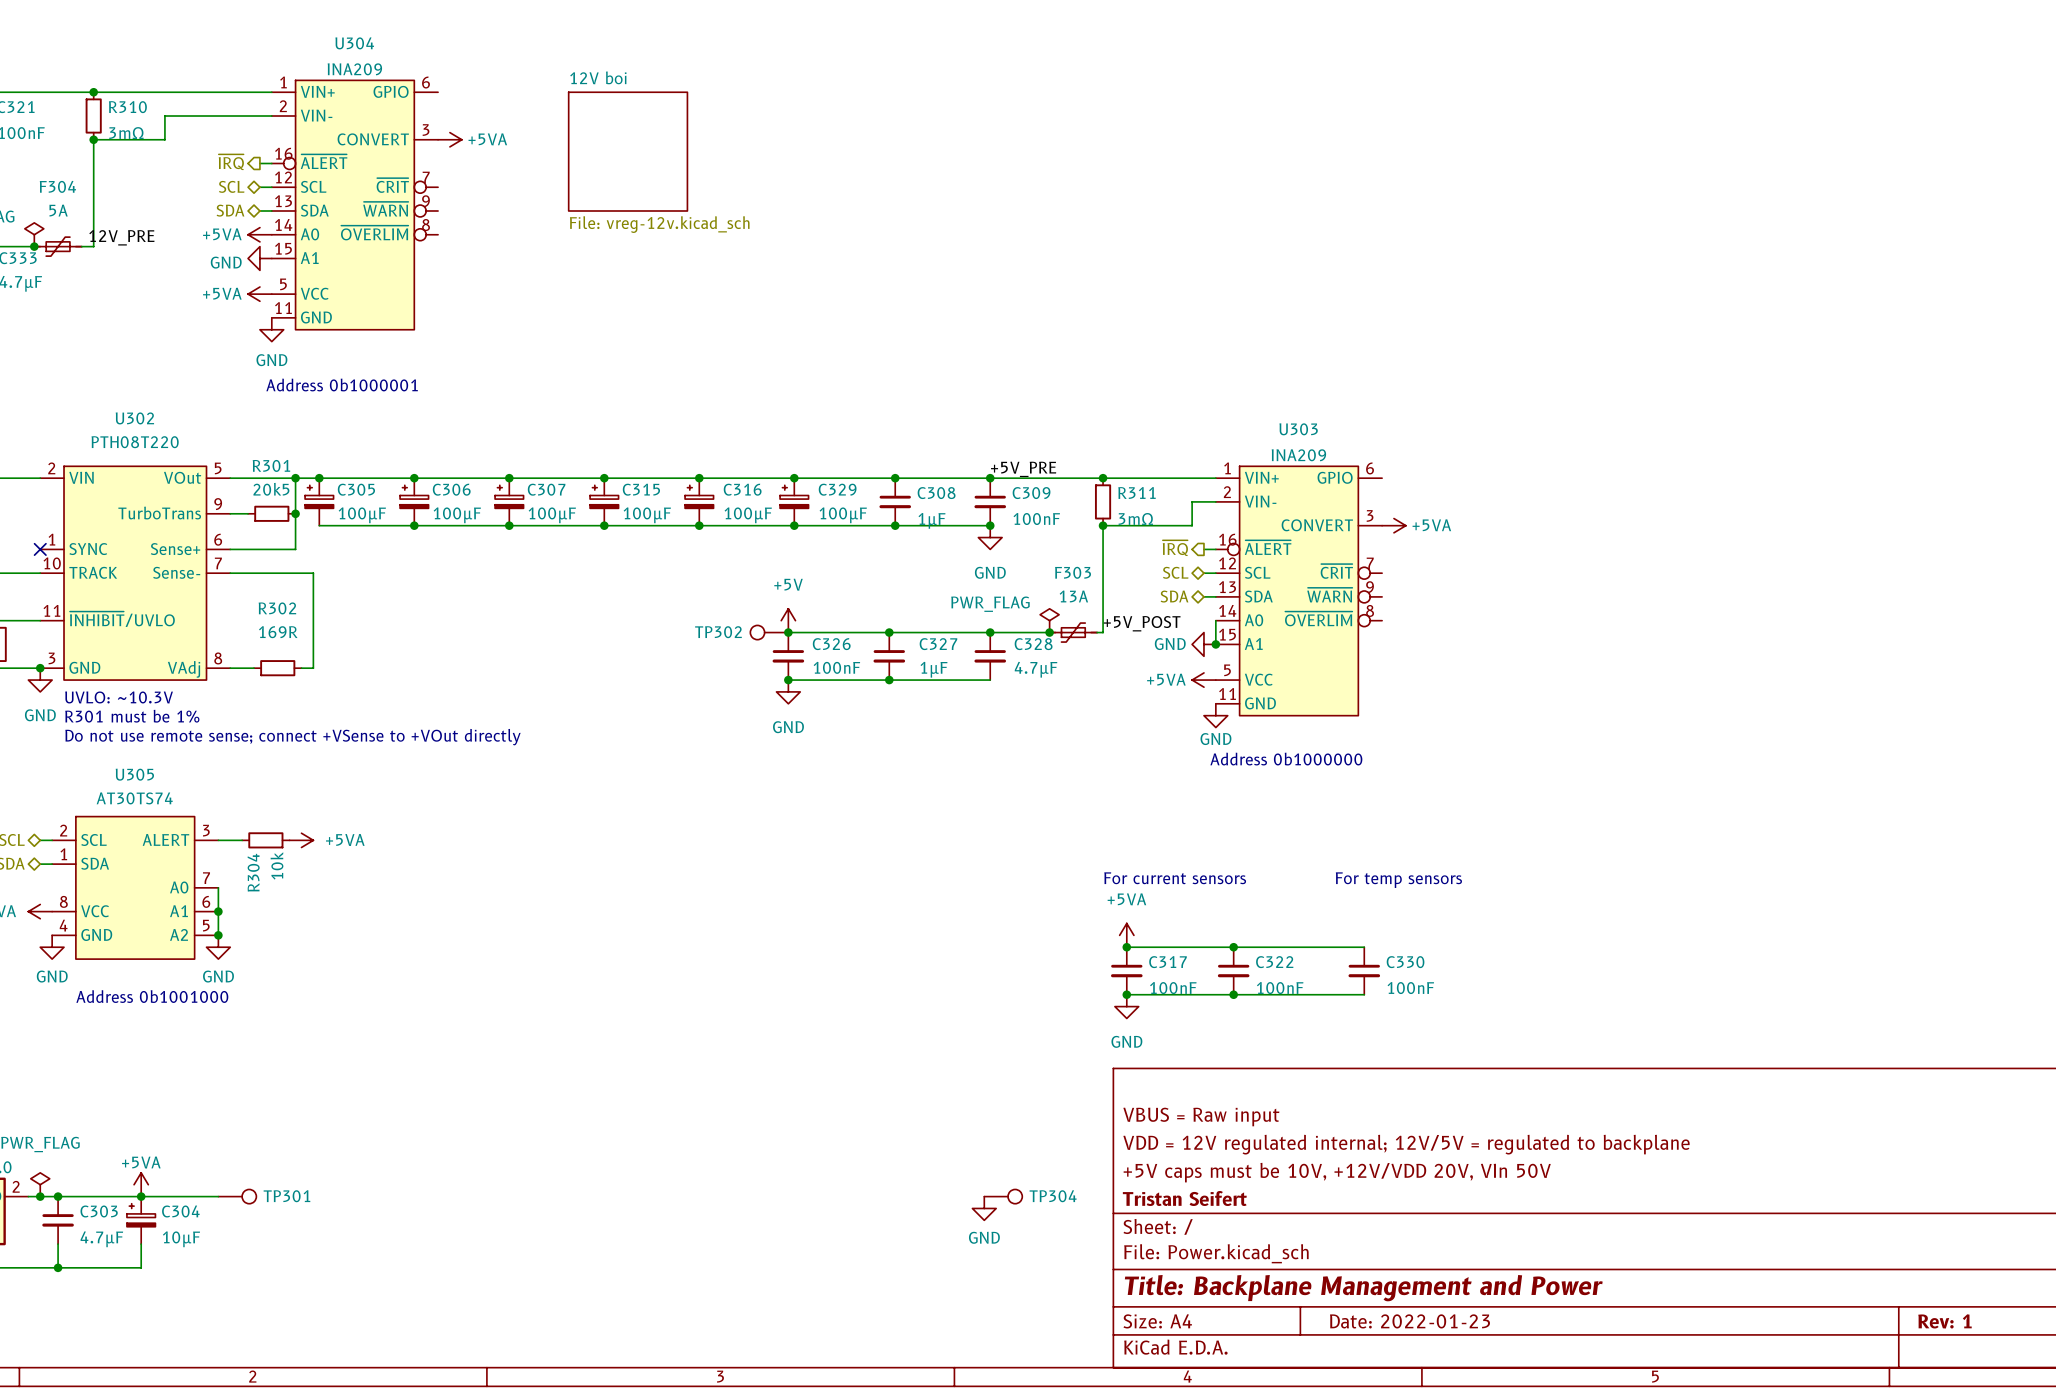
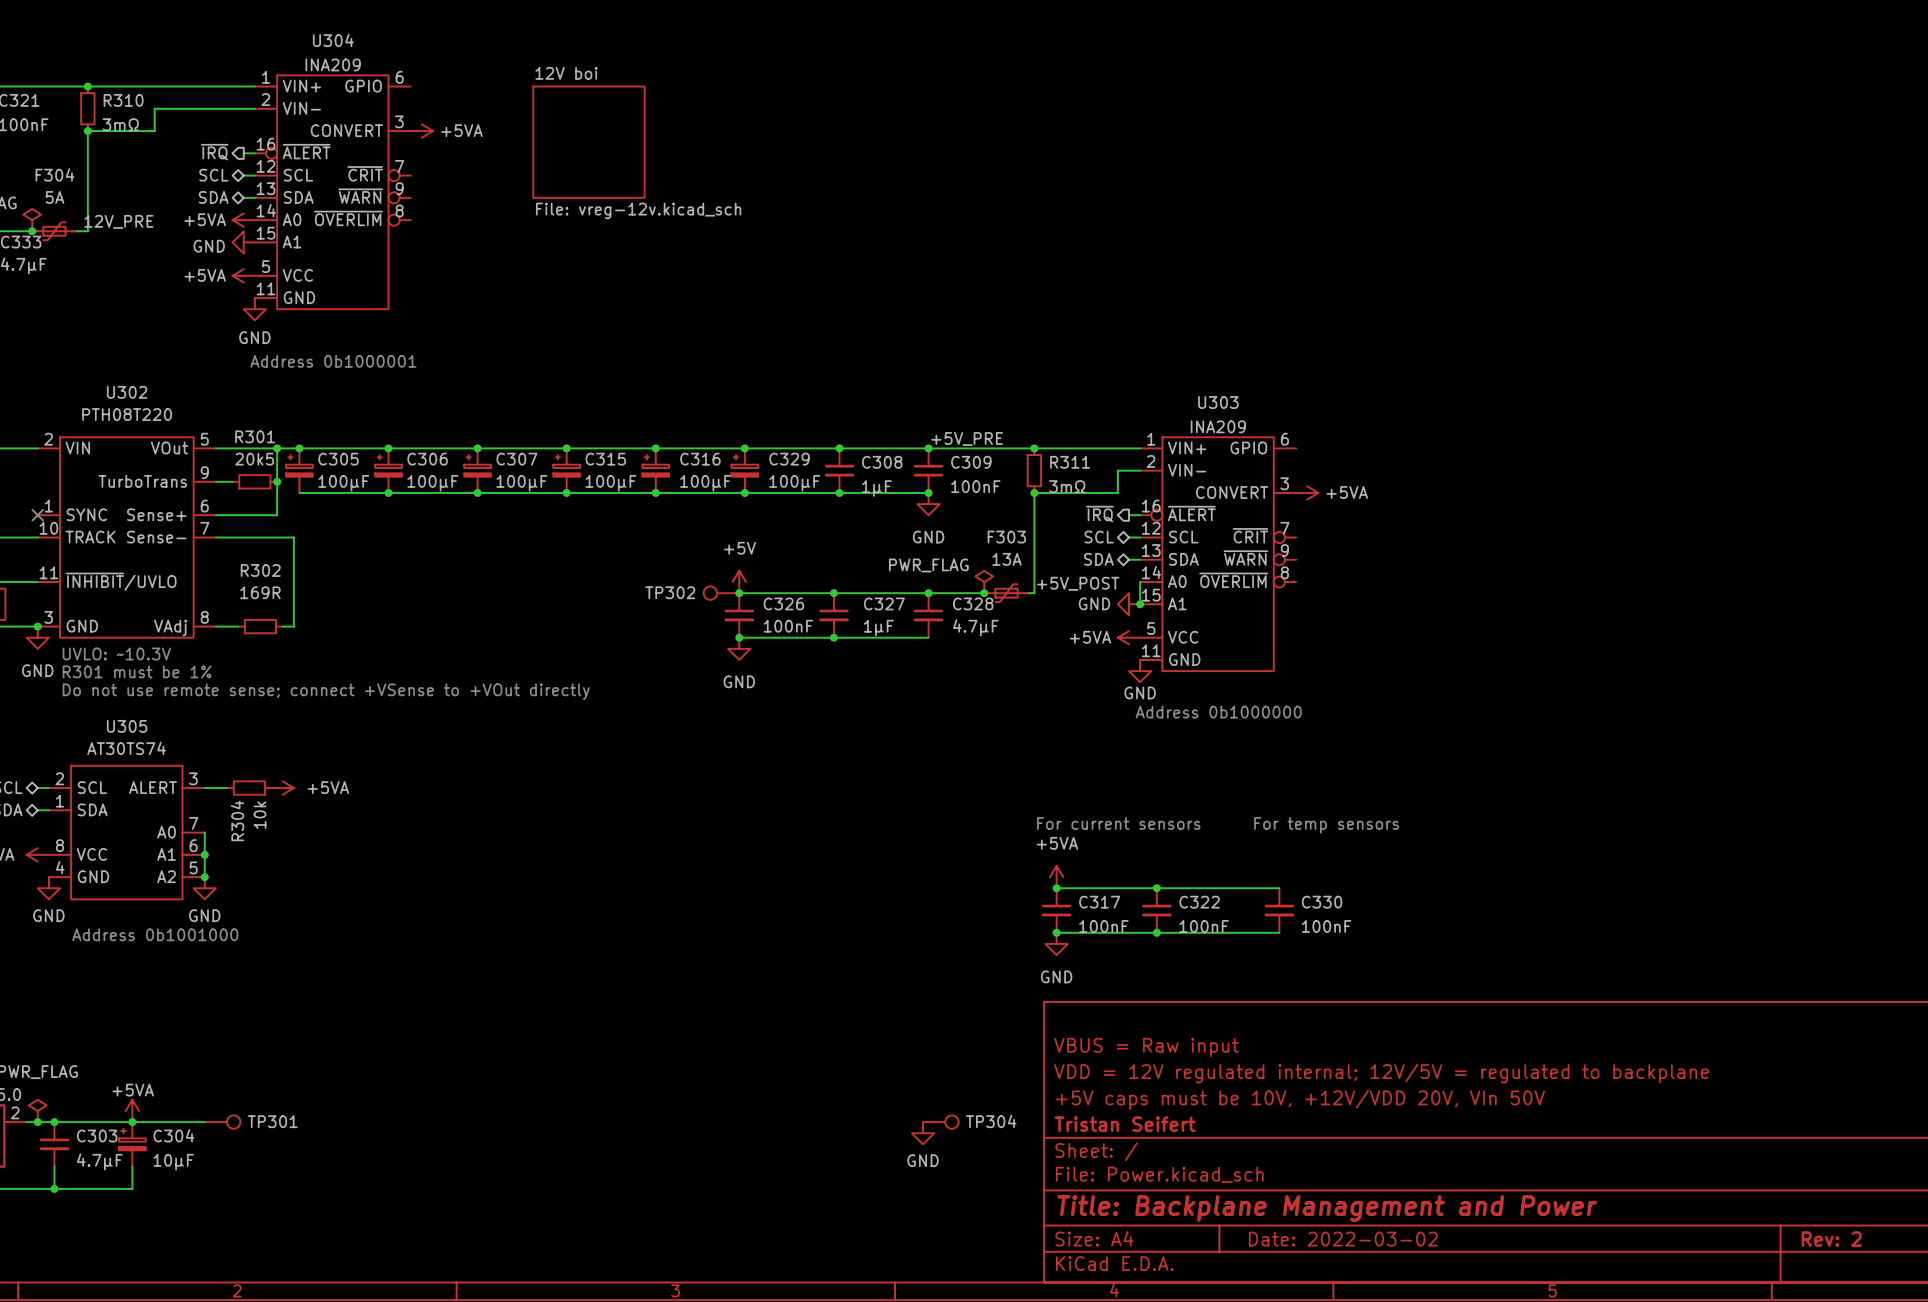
title block: Date: 2022-01-23 (1409, 1321) -> Date: 2022-03-02 (1343, 1239)
title block: Rev: 1 (1944, 1321) -> Rev: 2 (1831, 1239)

